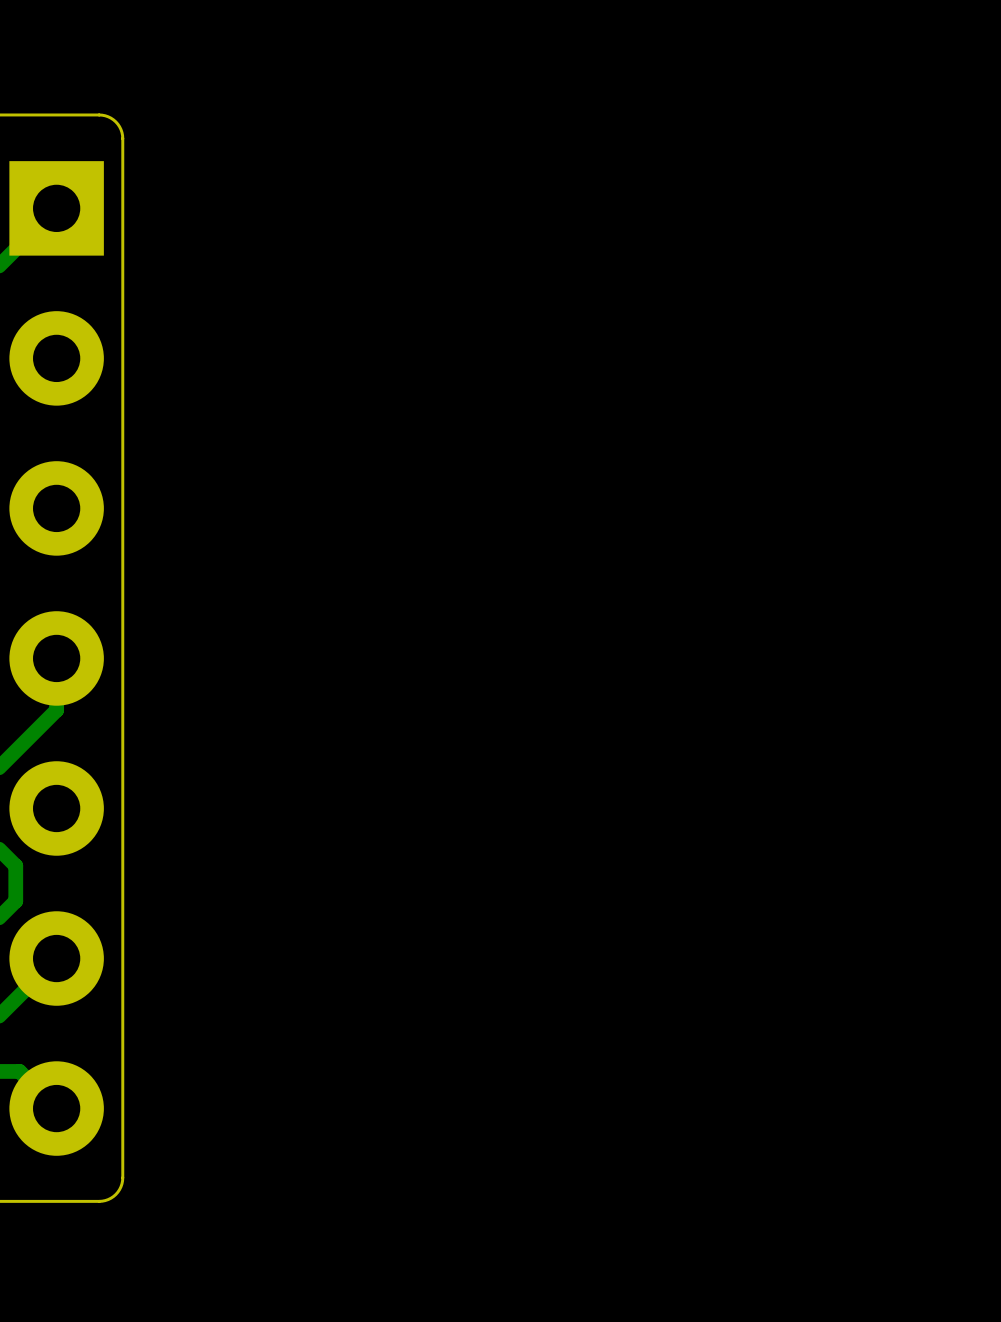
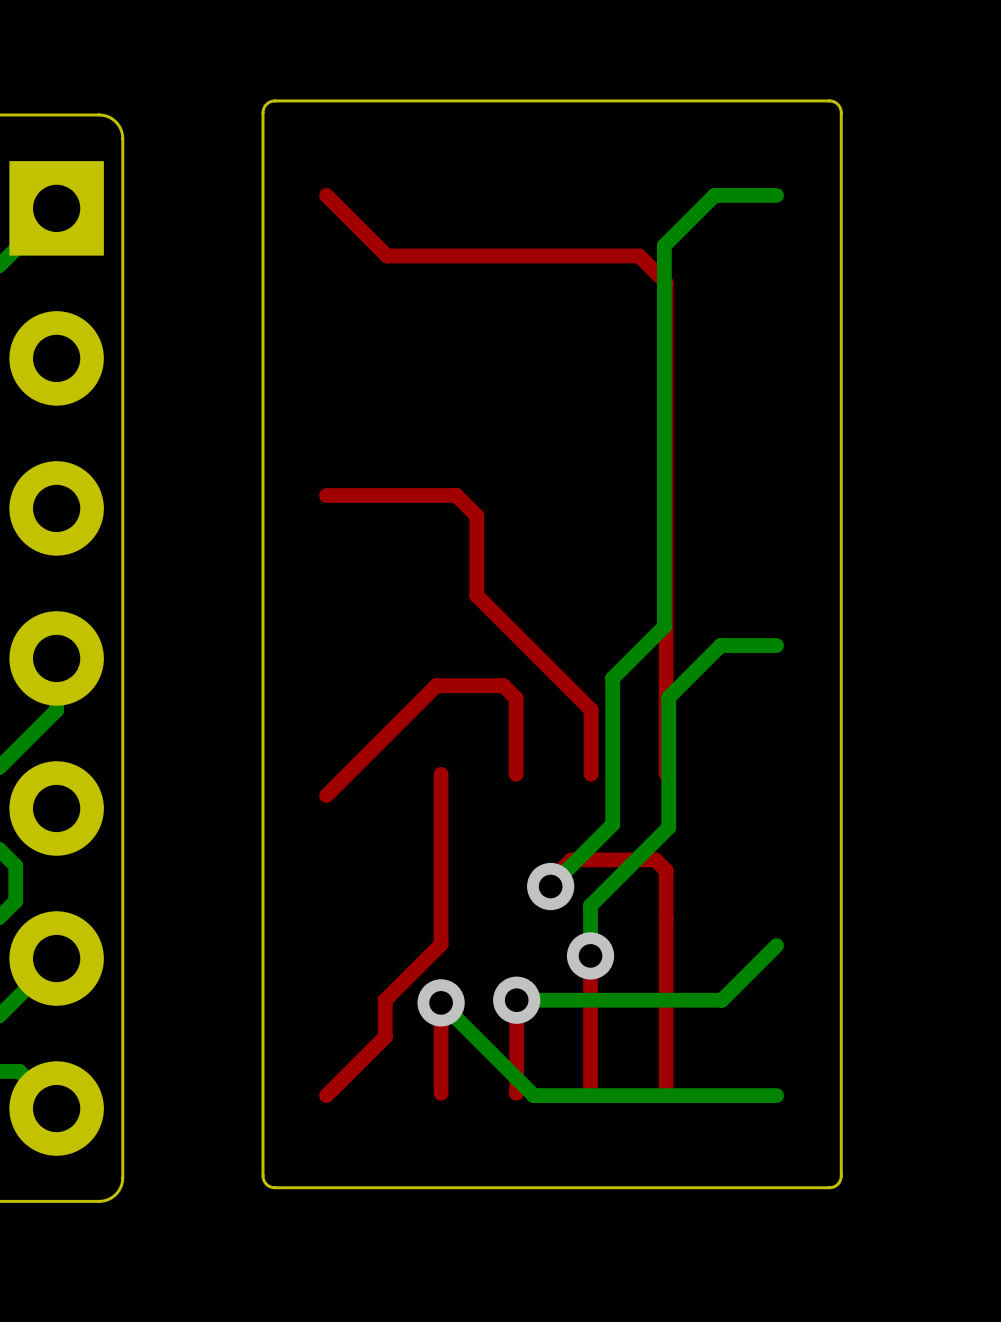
board edge: none -> (829, 100) (274, 100) (268, 102) (264, 106) (263, 112) (263, 1175) (264, 1181) (268, 1186) (274, 1187) (829, 1187) (835, 1186) (839, 1181) (841, 1175) (841, 112) (837, 104) (829, 100)
top track: none -> (326, 195) (387, 255) (639, 255) (666, 282) (666, 774)
bottom track: none -> (776, 195) (714, 195) (664, 245) (664, 626) (612, 678) (612, 824) (550, 886)
top track: none -> (326, 495) (456, 495) (476, 515) (476, 595) (591, 709) (591, 774)
bottom track: none -> (776, 645) (720, 645) (668, 697) (668, 827) (590, 905) (590, 955)
top track: none -> (441, 774) (441, 944) (385, 1000) (385, 1036) (326, 1095)
top track: none -> (516, 774) (516, 698) (503, 685) (436, 685) (326, 795)
top track: none -> (550, 886) (550, 880) (571, 859) (655, 859) (666, 870) (666, 1093)
via: none -> (550, 886)
bottom track: none -> (776, 945) (721, 1000) (516, 1000)
top track: none -> (590, 955) (590, 1092)
via: none -> (590, 955)
top track: none -> (516, 1000) (516, 1092)
via: none -> (516, 1000)
top track: none -> (441, 1001) (441, 1093)
bottom track: none -> (441, 1002) (533, 1095) (776, 1095)
via: none -> (441, 1002)

